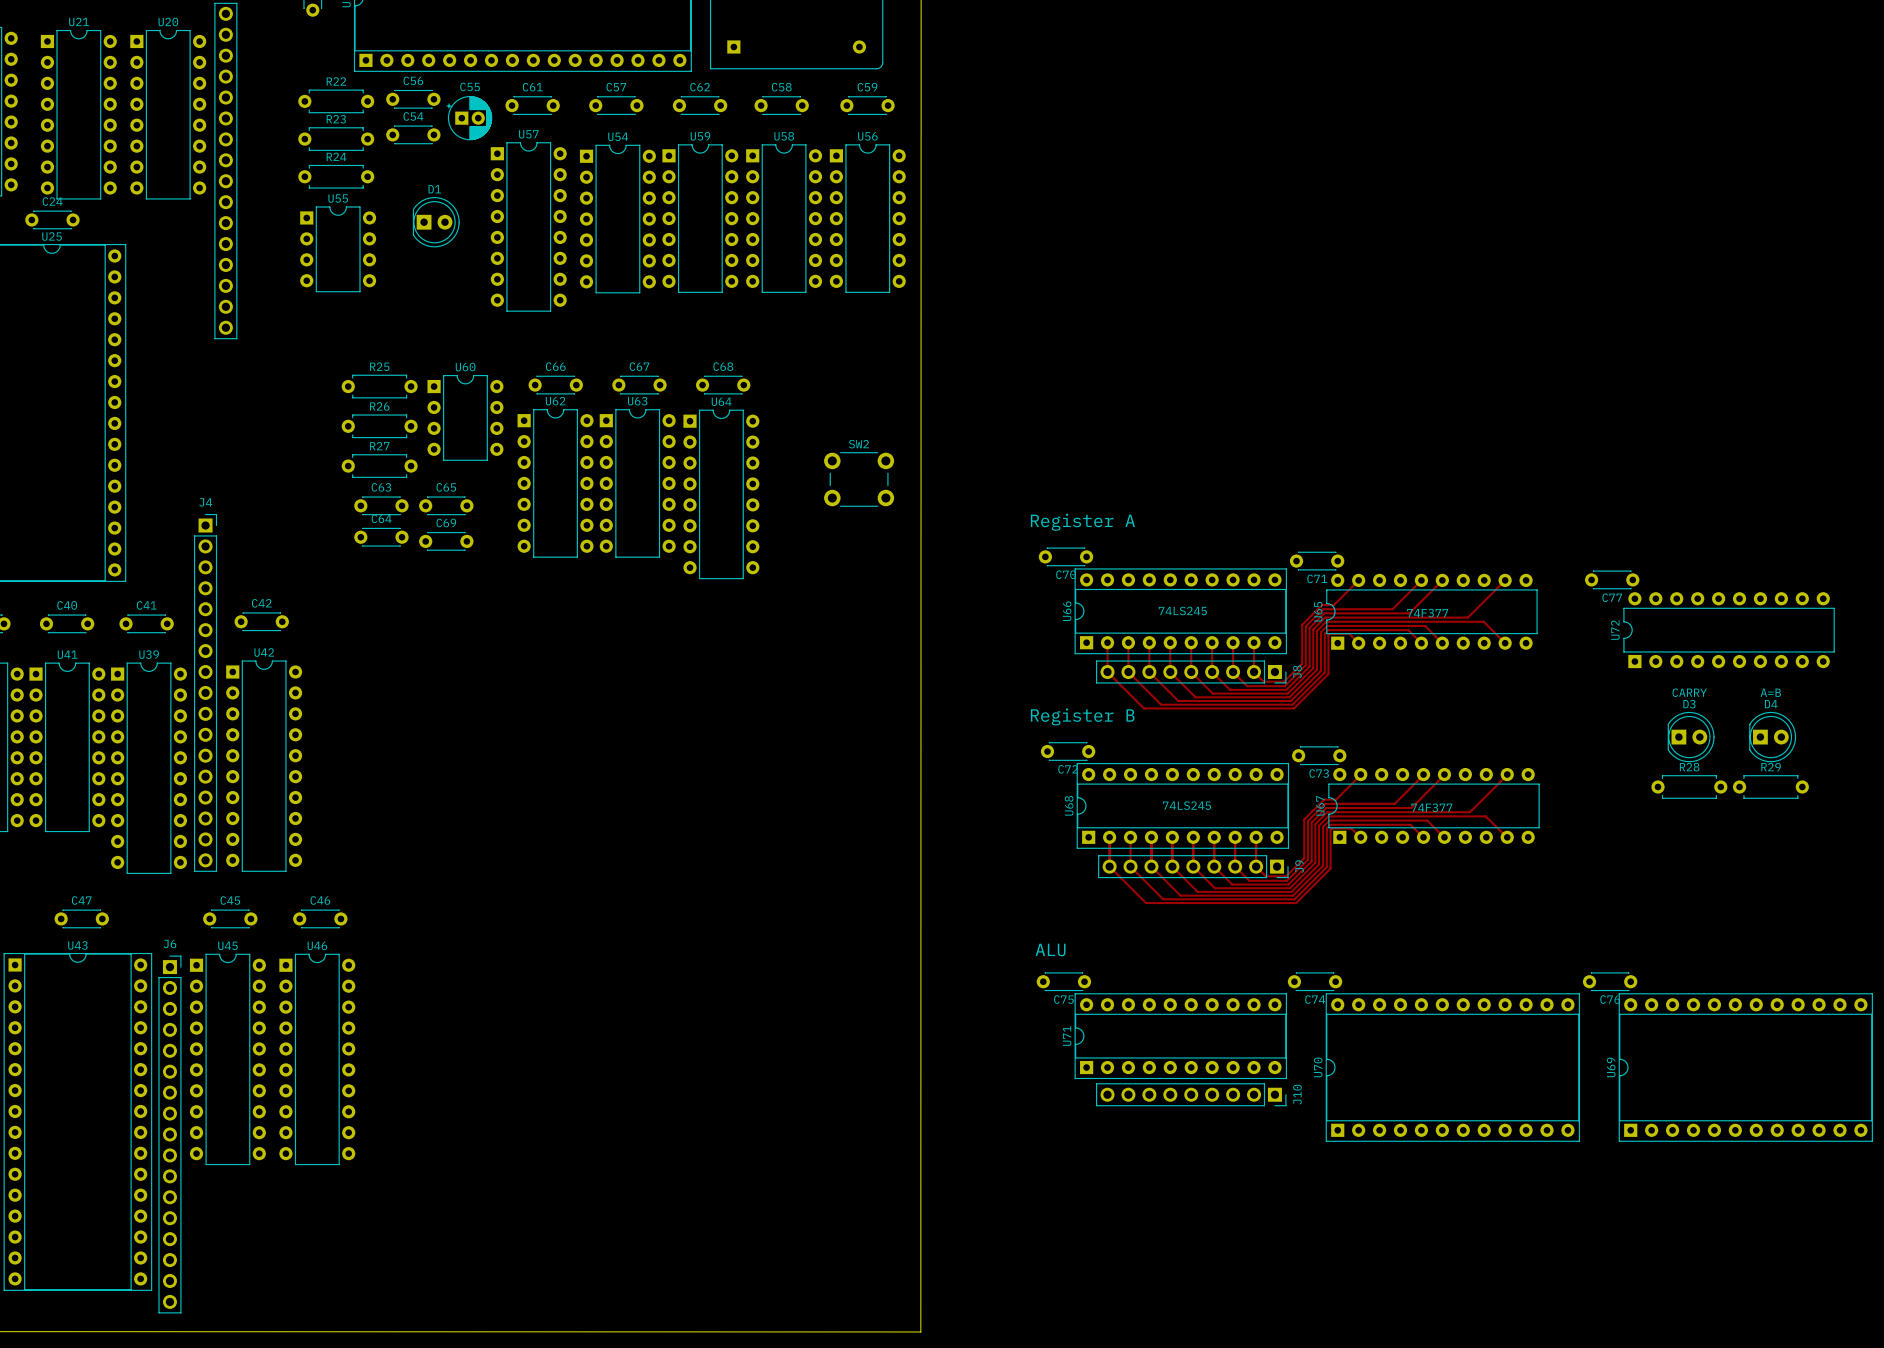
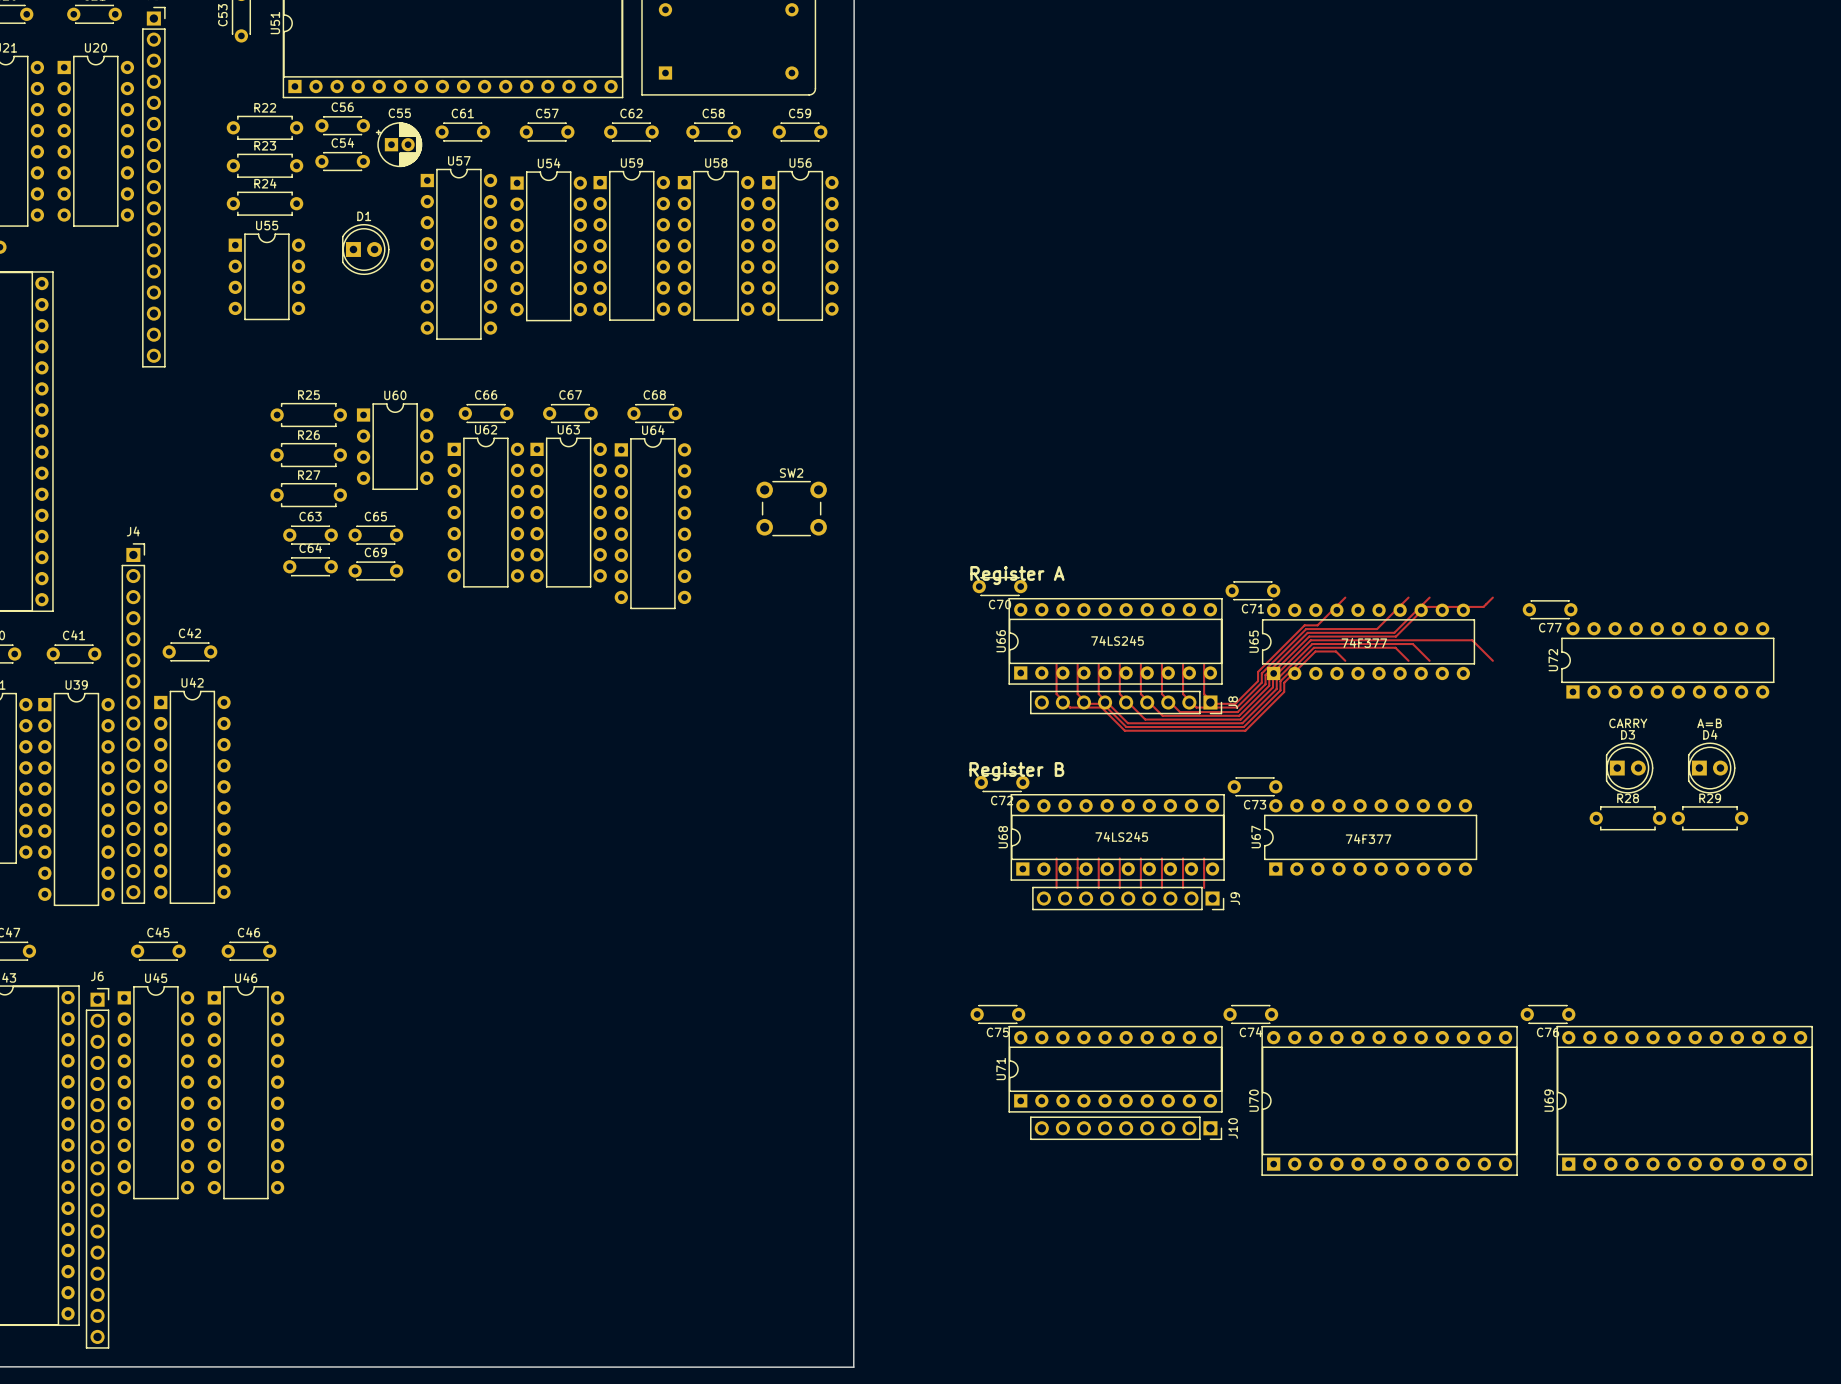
text position: Register A (1082, 522) -> Register A (1017, 575)
track: none -> (1345, 597) (1317, 625) (1304, 625) (1258, 671) (1258, 681) (1235, 703) (1213, 703) (1204, 694) (1204, 664)
track: none -> (1408, 597) (1377, 629) (1306, 629) (1261, 673) (1261, 682) (1236, 707) (1196, 707) (1183, 694) (1183, 664)
track: none -> (1429, 597) (1394, 632) (1307, 632) (1265, 675) (1265, 684) (1237, 712) (1179, 712) (1161, 694) (1161, 664)
track: none -> (1492, 597) (1483, 606) (1425, 606) (1395, 636) (1309, 636) (1269, 676) (1269, 685) (1239, 715) (1162, 715) (1140, 694) (1140, 664)
track: (1358, 580) (1334, 605) (1322, 605) (1302, 624) (1302, 663) (1284, 681) (1263, 681) (1254, 672) (1254, 642) -> none
track: (1421, 580) (1392, 609) (1323, 609) (1305, 626) (1305, 665) (1284, 686) (1247, 686) (1233, 672) (1233, 642) -> none
track: (1442, 580) (1409, 613) (1324, 613) (1309, 627) (1309, 666) (1286, 689) (1230, 689) (1212, 672) (1212, 642) -> none
track: (1505, 580) (1467, 617) (1458, 617) -> (1408, 660) (1395, 647)
track: (1377, 617) (1325, 617) (1313, 629) (1313, 668) (1287, 693) (1212, 693) (1191, 672) (1191, 642) -> (1313, 647) (1280, 681) (1280, 690) (1243, 727) (1126, 727) (1103, 703) (1087, 703) (1077, 694) (1077, 664)
track: (1483, 621) (1326, 621) (1316, 631) (1316, 669) (1289, 697) (1195, 697) (1170, 672) (1170, 642) -> (1420, 651) (1412, 644) (1312, 644) (1276, 679) (1276, 688) (1242, 723) (1127, 723) (1098, 694) (1098, 664)
track: (1408, 630) (1328, 630) (1324, 633) (1324, 672) (1292, 704) (1161, 704) (1128, 672) (1128, 642) -> (1344, 660) (1336, 651) (1315, 651) (1284, 682) (1284, 691) (1245, 730) (1124, 730) (1101, 707) (1070, 707) (1056, 694) (1056, 664)
track: (1408, 630) (1421, 643) -> none
track: (1492, 630) (1505, 643) -> none
track: none -> (1492, 660) (1472, 640) (1310, 640) (1273, 678) (1273, 687) (1240, 719) (1145, 719) (1119, 694) (1119, 664)
track: (1107, 642) (1107, 672) (1143, 708) (1294, 708) (1328, 674) (1328, 635) (1349, 633) (1358, 643) -> none
track: (1149, 642) (1149, 672) (1178, 701) (1290, 701) (1320, 671) (1320, 632) (1327, 625) (1425, 625) (1442, 643) -> none
text position: Register B (1082, 716) -> Register B (1016, 771)
track: (1360, 775) (1336, 799) (1324, 799) (1304, 819) (1304, 858) (1286, 876) (1265, 876) (1256, 866) (1256, 837) -> none
track: (1423, 775) (1394, 803) (1325, 803) (1307, 821) (1307, 859) (1286, 880) (1249, 880) (1235, 866) (1235, 837) -> none
track: (1444, 775) (1411, 808) (1326, 808) (1311, 822) (1311, 861) (1288, 884) (1232, 884) (1214, 866) (1214, 837) -> none
track: (1507, 775) (1470, 812) (1327, 812) (1315, 824) (1315, 862) (1290, 888) (1214, 888) (1193, 866) (1193, 837) -> none
track: none -> (1056, 858) (1056, 887)
track: none -> (1077, 858) (1077, 887)
track: none -> (1098, 858) (1098, 887)
track: none -> (1119, 858) (1119, 887)
track: none -> (1140, 858) (1140, 887)
track: none -> (1161, 858) (1161, 887)
track: none -> (1183, 858) (1183, 887)
track: none -> (1204, 858) (1204, 887)
track: (1109, 837) (1109, 866) (1146, 903) (1296, 903) (1330, 868) (1330, 829) (1351, 828) (1360, 837) -> none
track: (1130, 837) (1130, 866) (1163, 899) (1294, 899) (1326, 867) (1326, 828) (1330, 824) (1410, 824) (1423, 837) -> none
track: (1151, 837) (1151, 866) (1180, 895) (1293, 895) (1323, 865) (1323, 826) (1329, 820) (1427, 820) (1444, 837) -> none
track: (1172, 837) (1172, 866) (1197, 891) (1291, 891) (1319, 864) (1319, 825) (1328, 816) (1485, 816) (1507, 837) -> none
text: ALU (1050, 949) -> none

